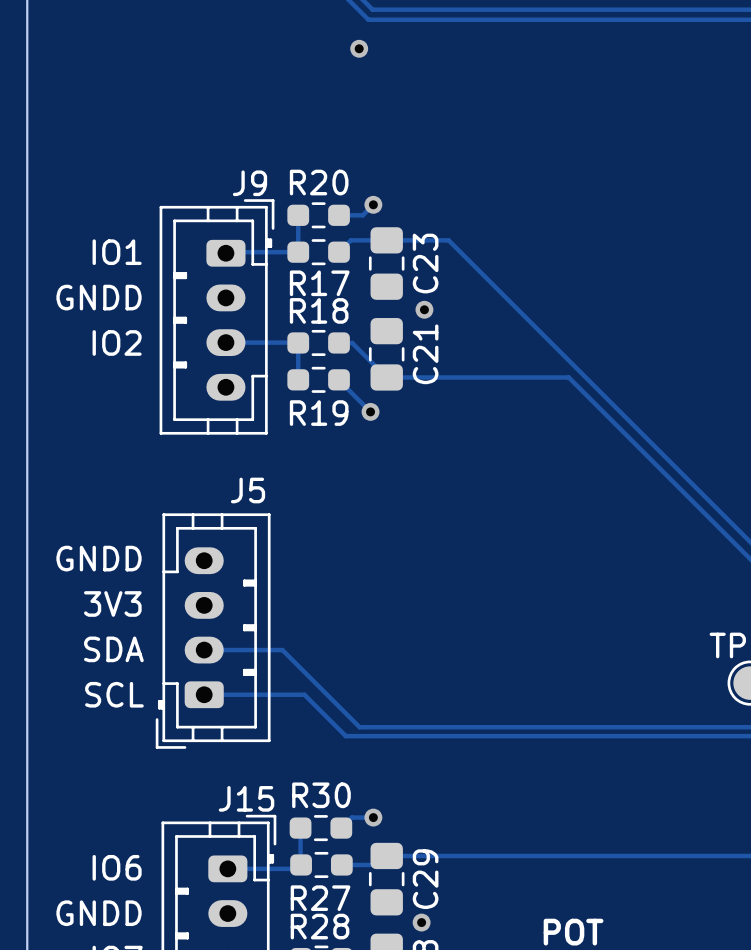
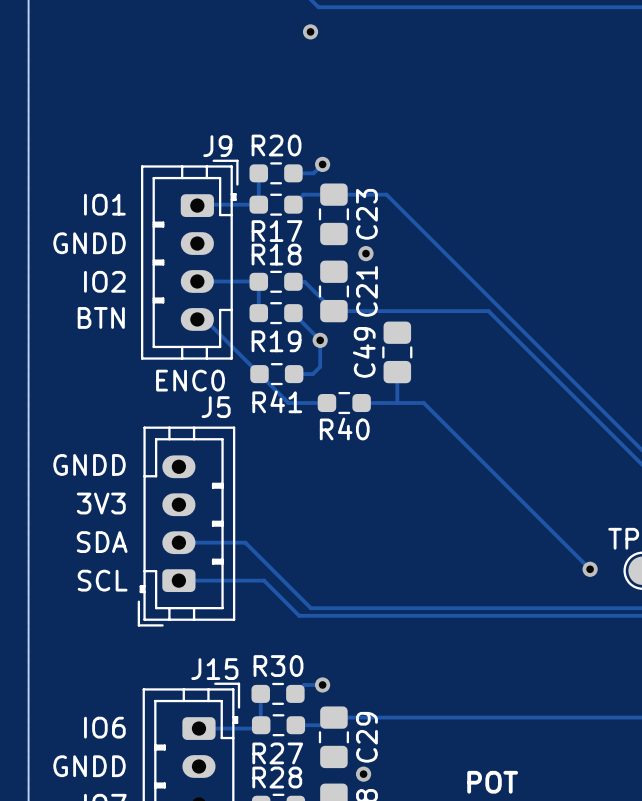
text: none -> BTN (101, 317)
track: none -> (204, 319) (288, 403) (326, 403)
track: none -> (320, 340) (320, 366) (312, 374) (294, 374)
C49: none -> (397, 352)
track: none -> (397, 372) (397, 403)
R41: none -> (276, 374)
text: none -> ENC0 (190, 380)
R40: none -> (344, 403)
track: none -> (361, 403) (423, 403) (590, 569)
via: none -> (590, 569)

